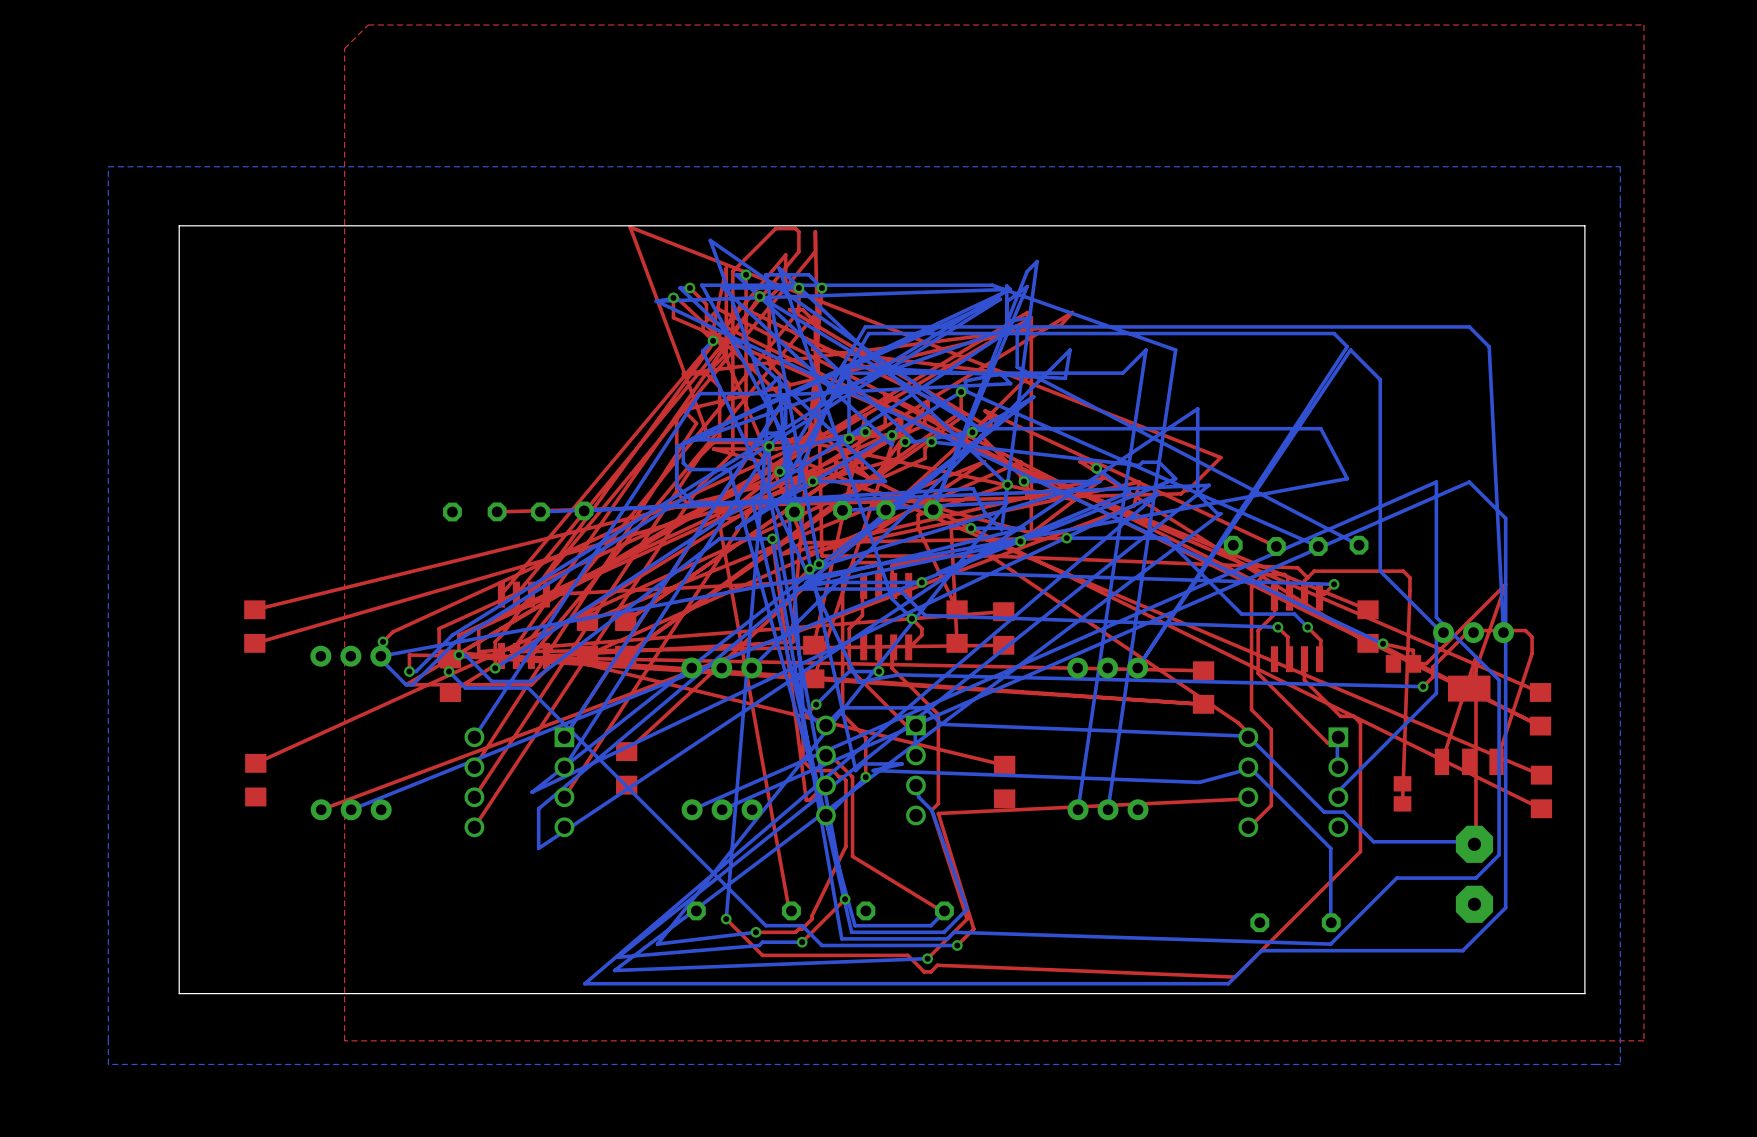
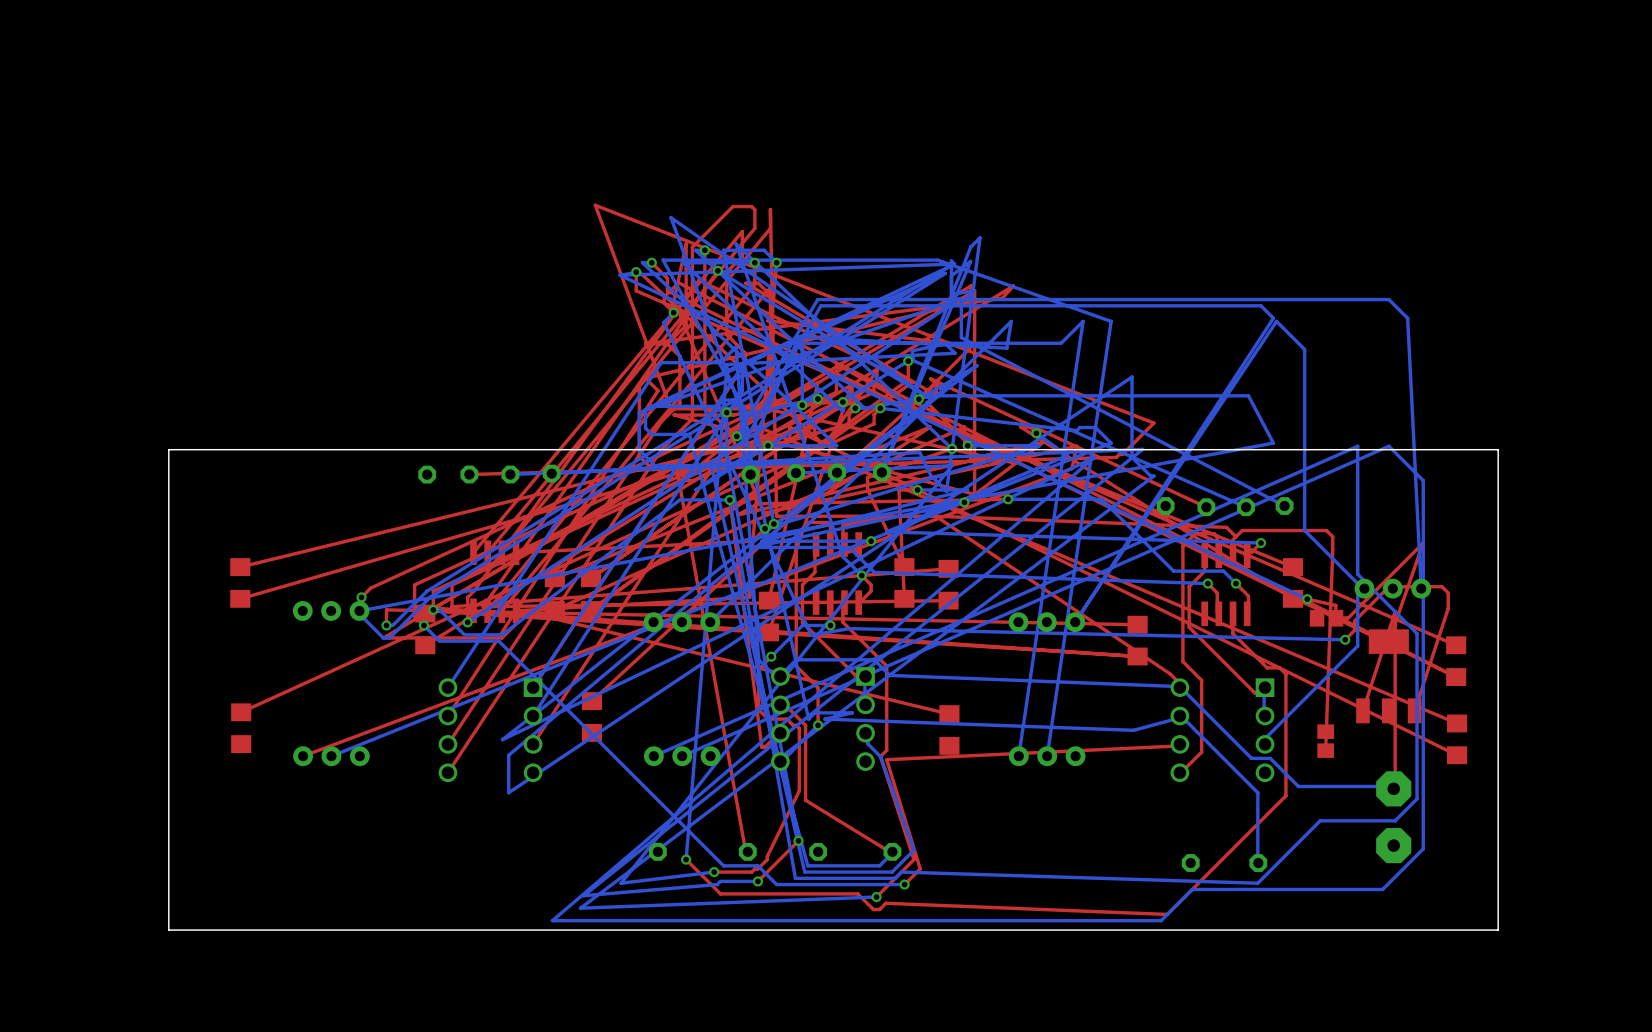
top zone outline: (1643, 24) (1643, 1040) (344, 1040) (344, 48) (368, 24) (1643, 24) -> none
bottom zone outline: (1620, 166) (108, 166) (108, 1064) (1620, 1064) (1620, 166) -> none
board edge: (1584, 485) (1584, 225) (179, 225) (179, 485) -> (1498, 449) (168, 449)

